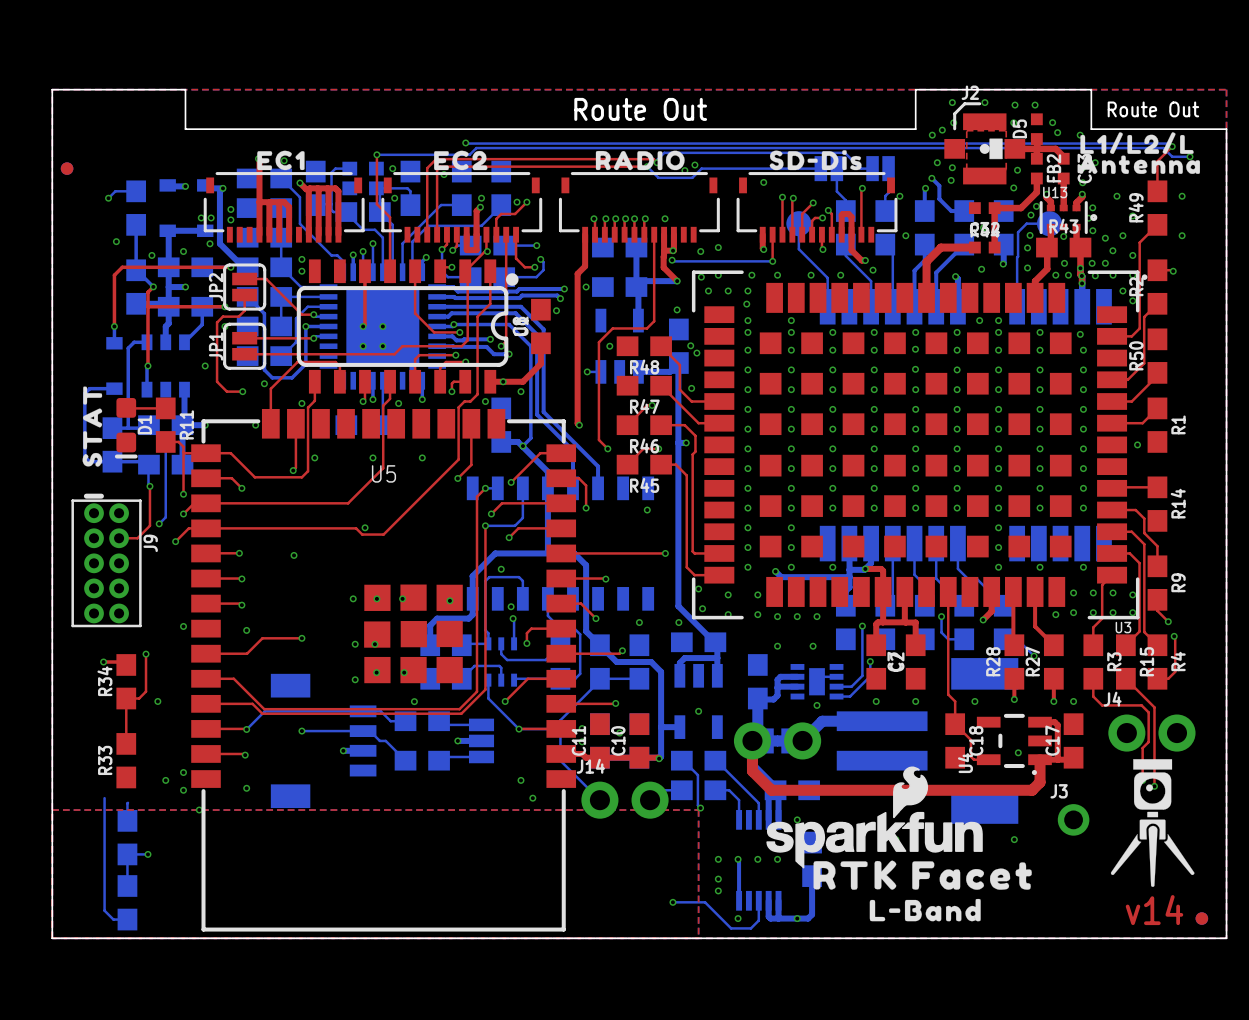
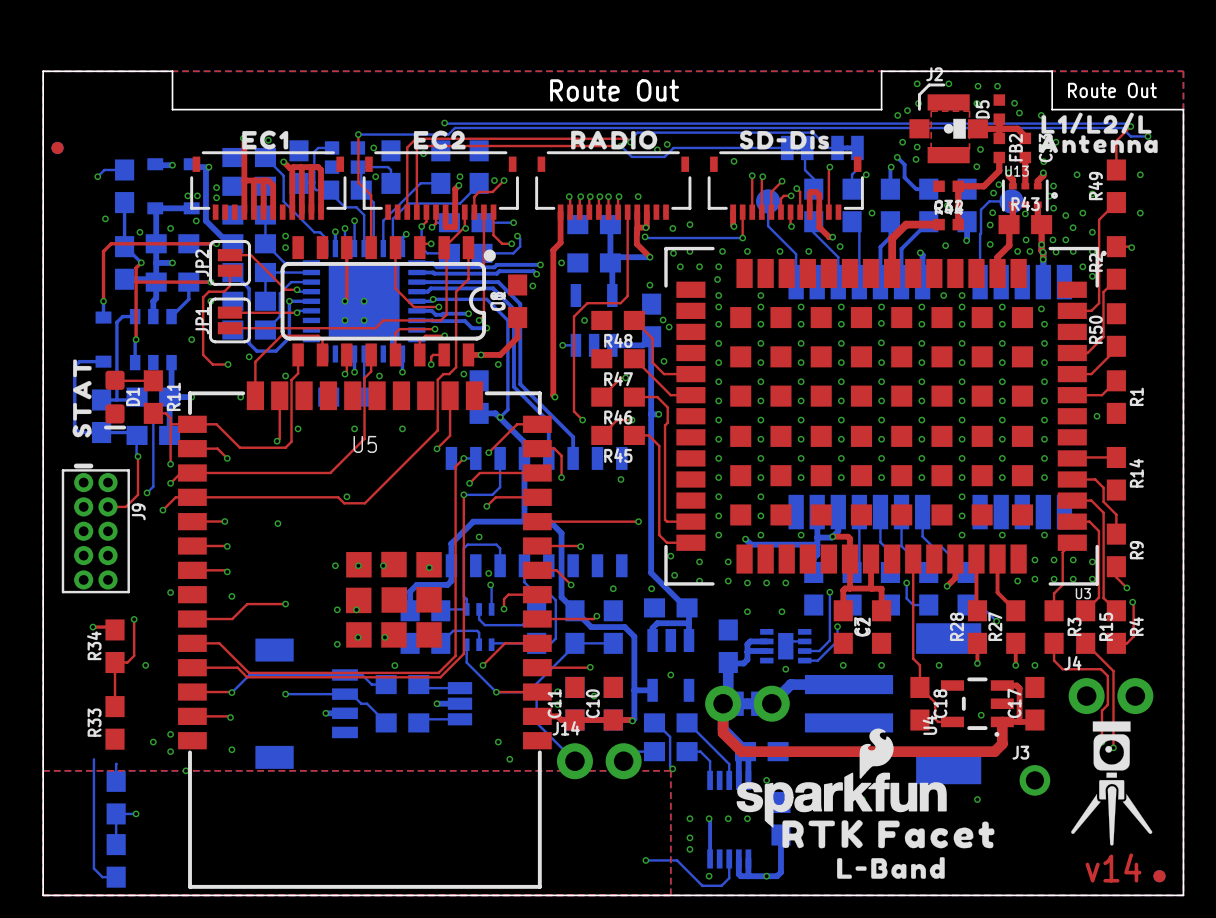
part footprint: [814, 156, 844, 182] -> [780, 135, 814, 161]
part footprint: [866, 156, 895, 182] -> [831, 135, 864, 161]

